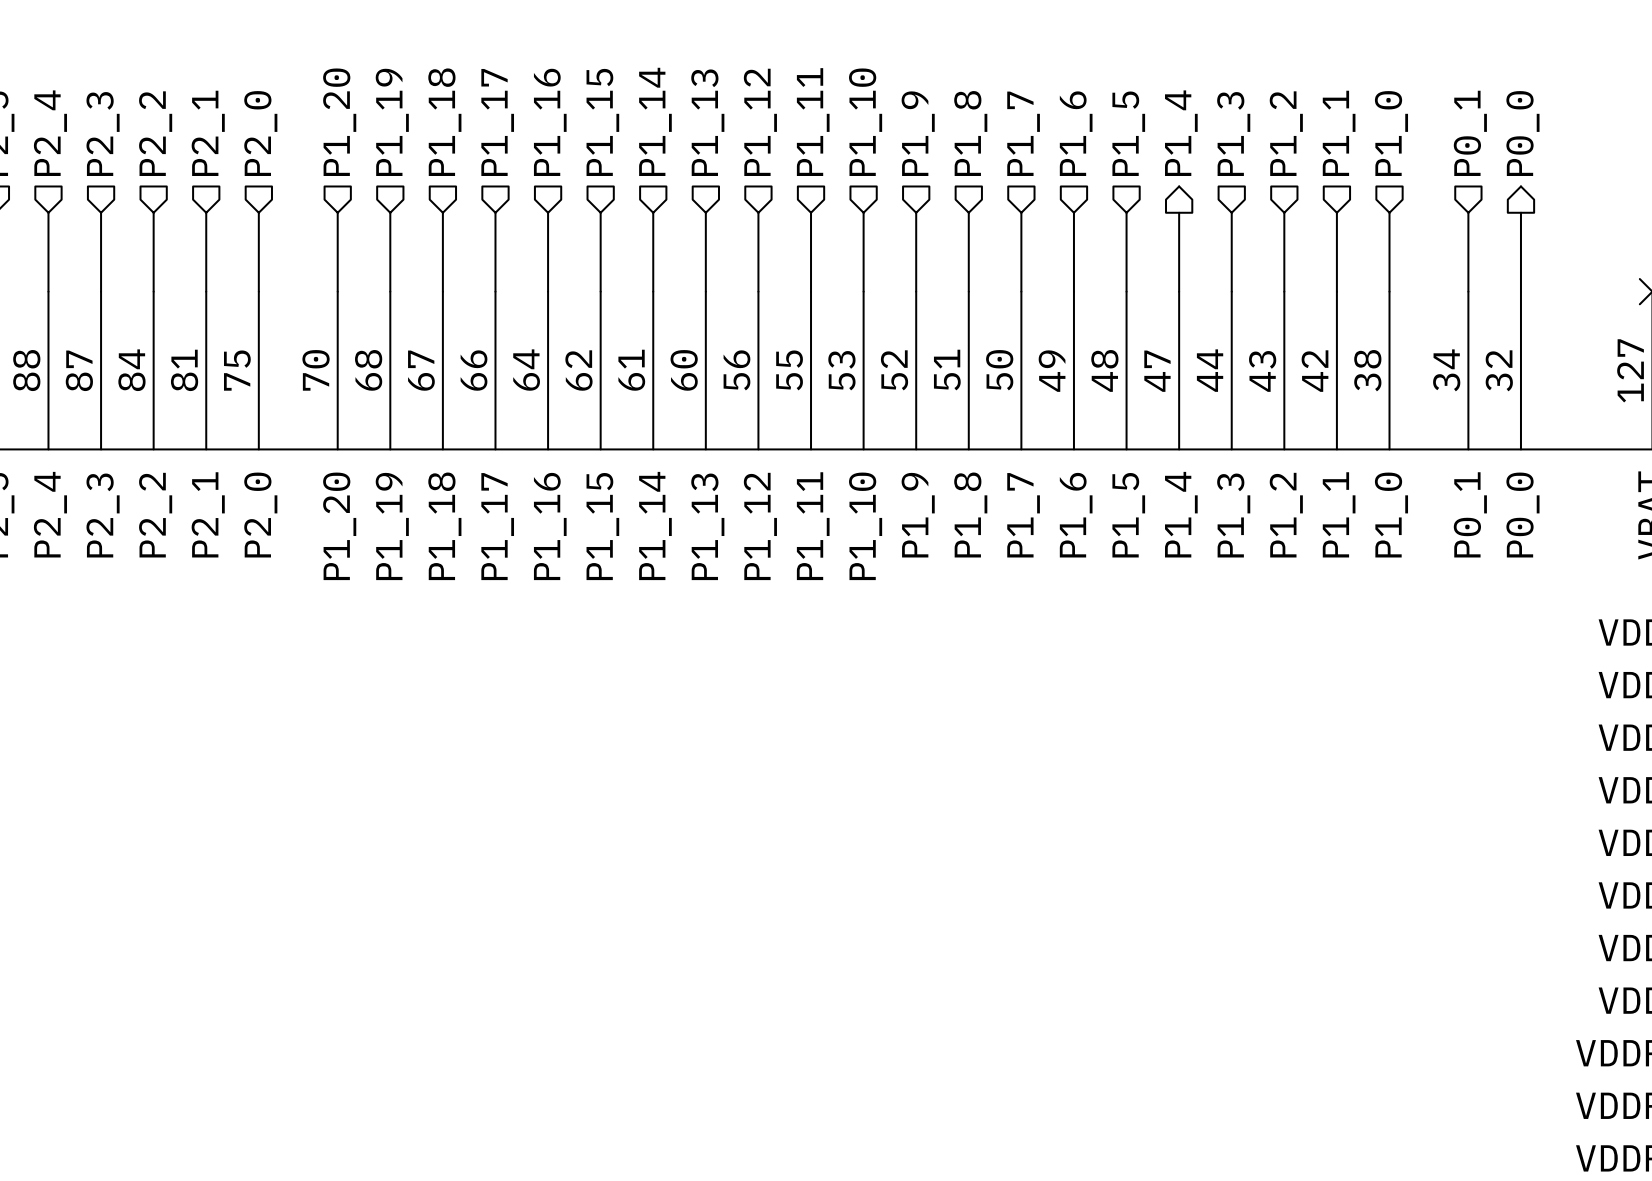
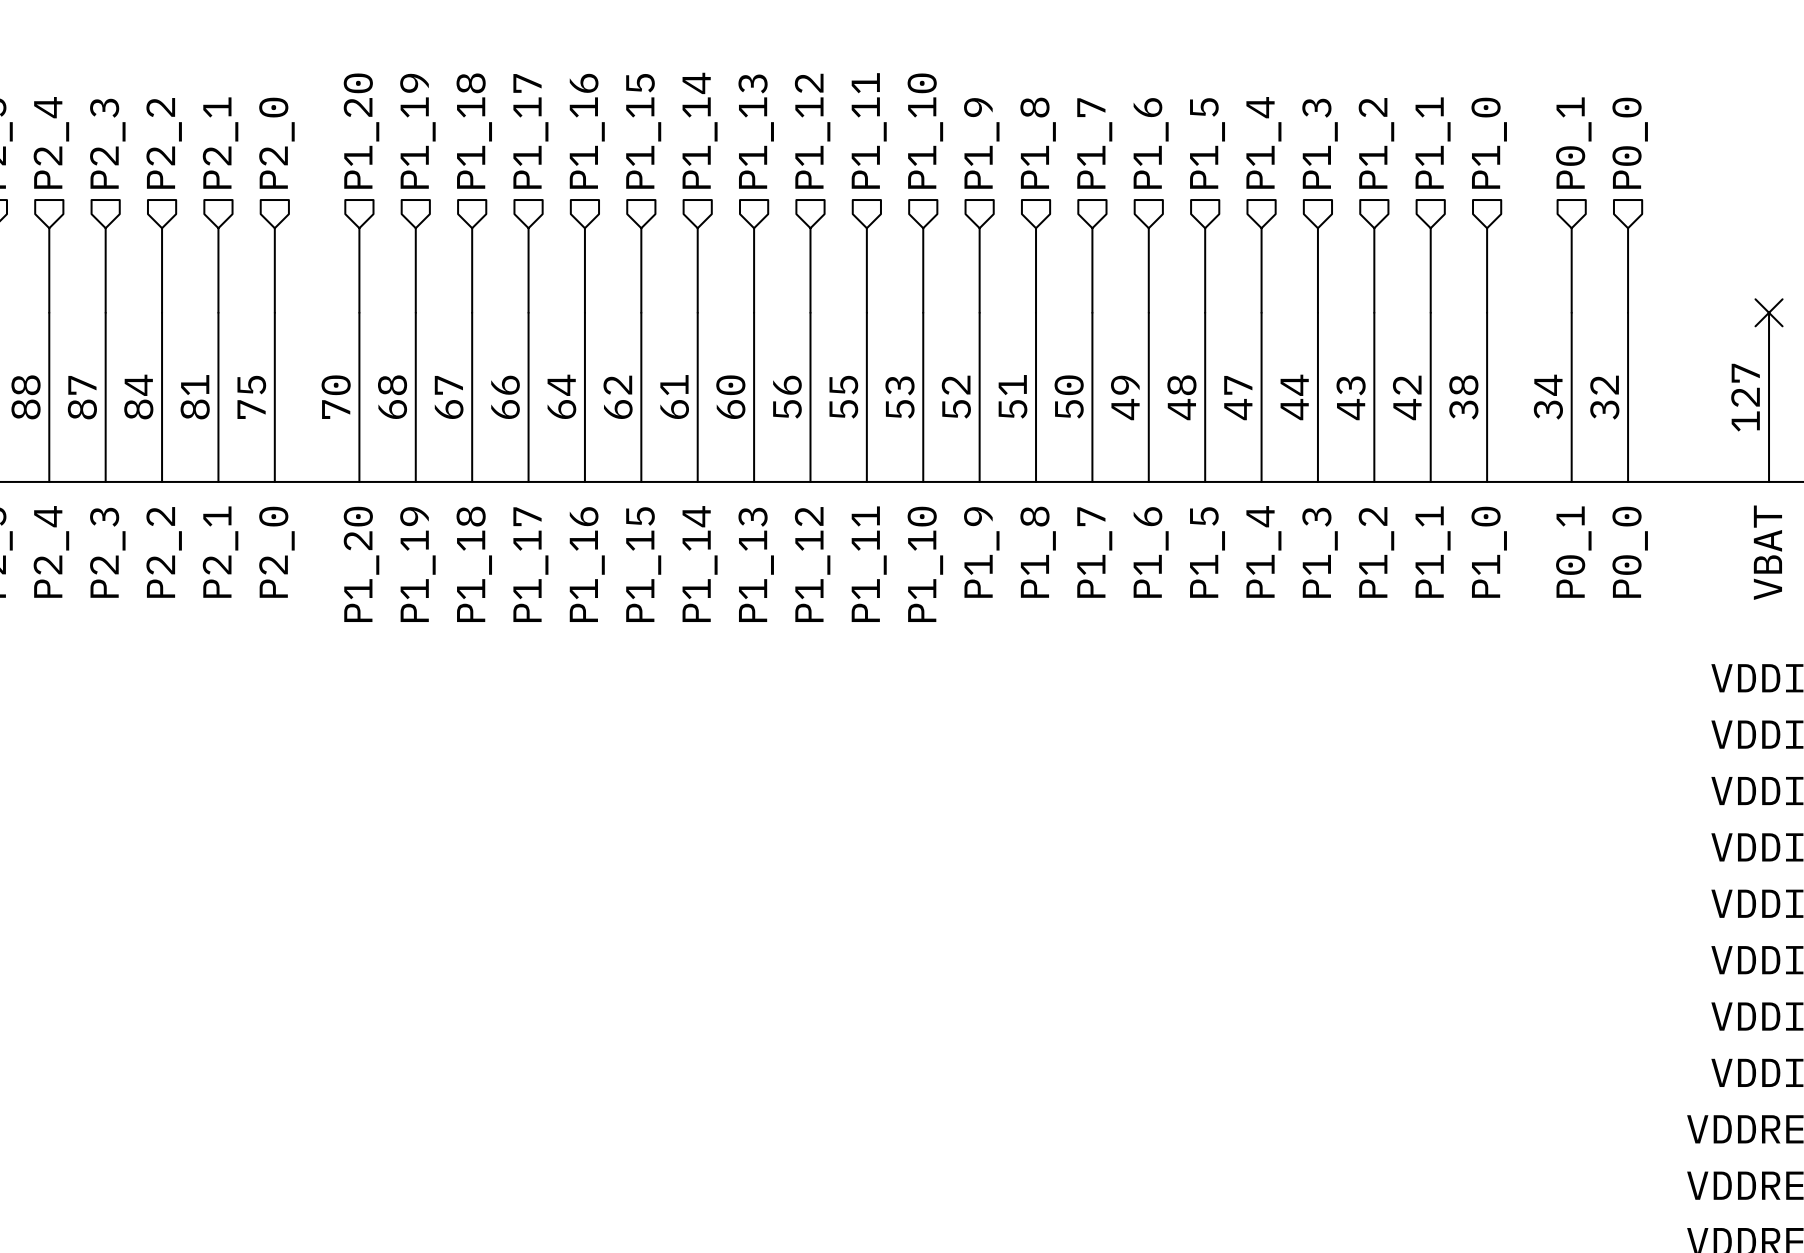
hierarchical label shape: output (1181, 133) -> input (1263, 142)
hierarchical label shape: output (1522, 133) -> input (1630, 143)

